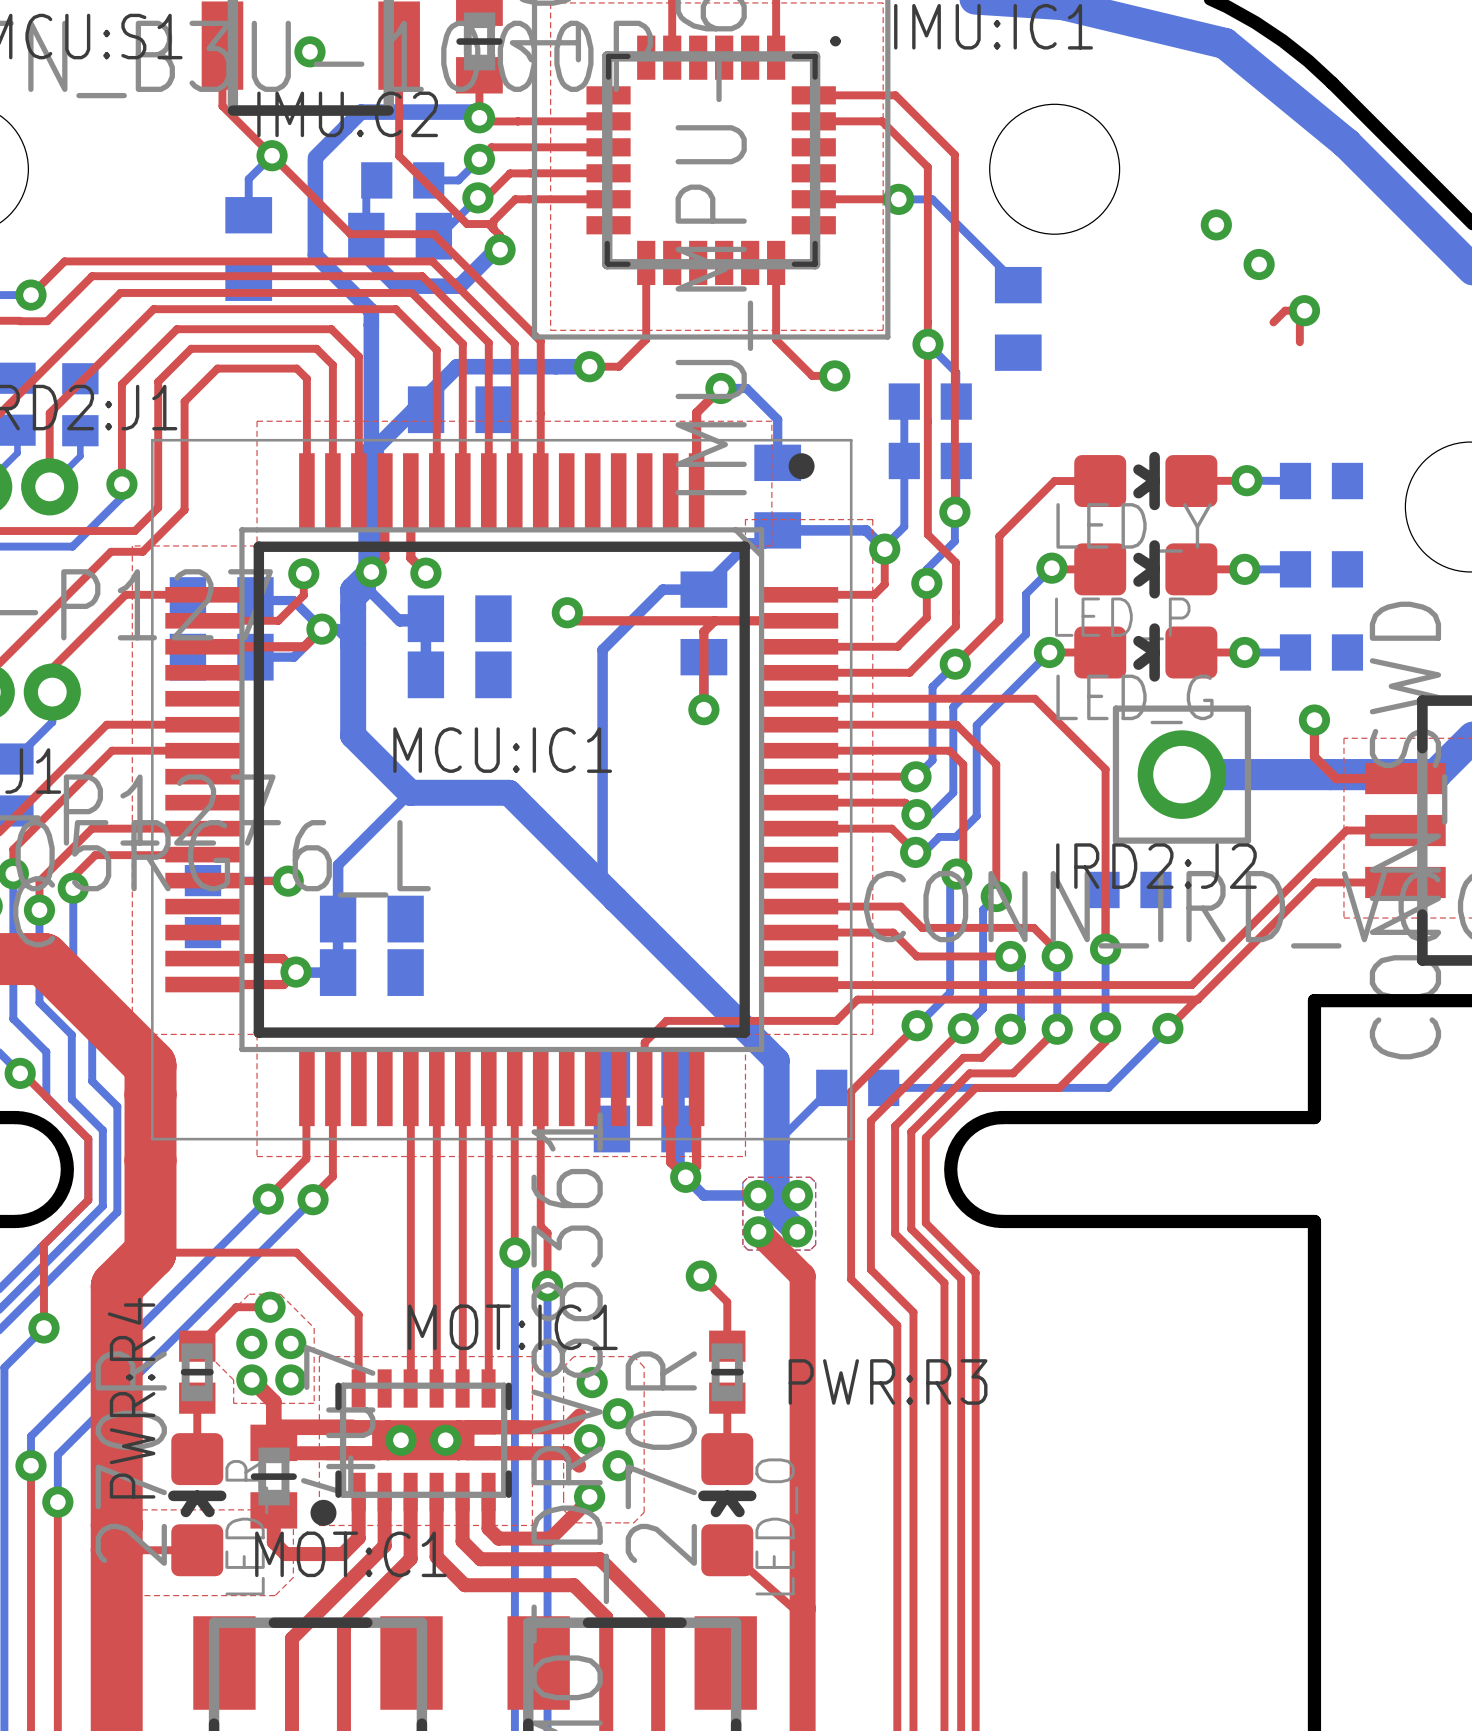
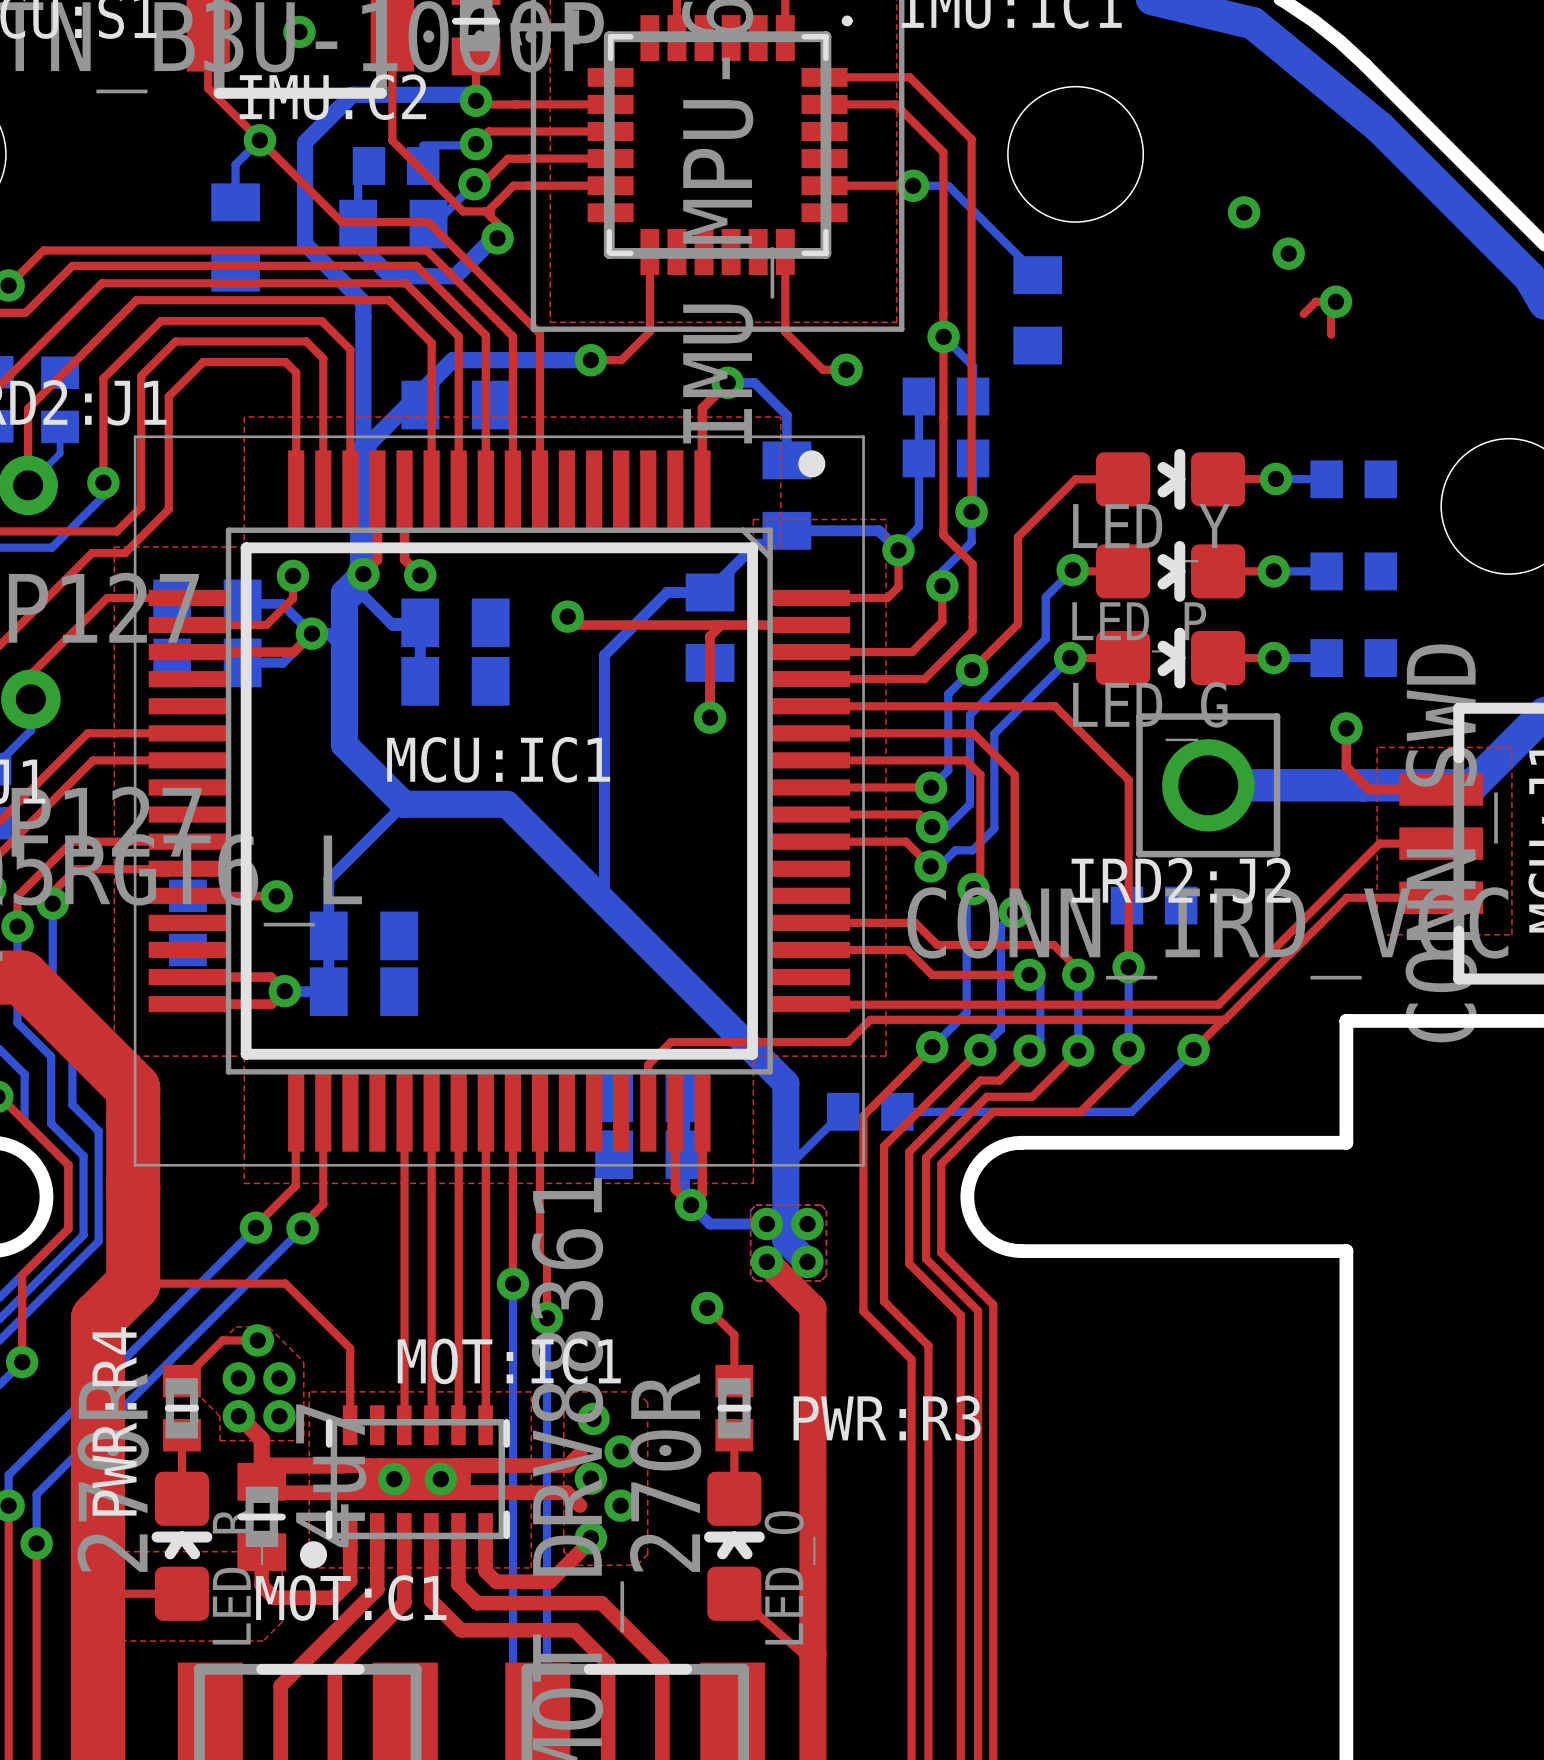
bottom track: (478, 160) (458, 180) (428, 180) -> (474, 145) (423, 145)

